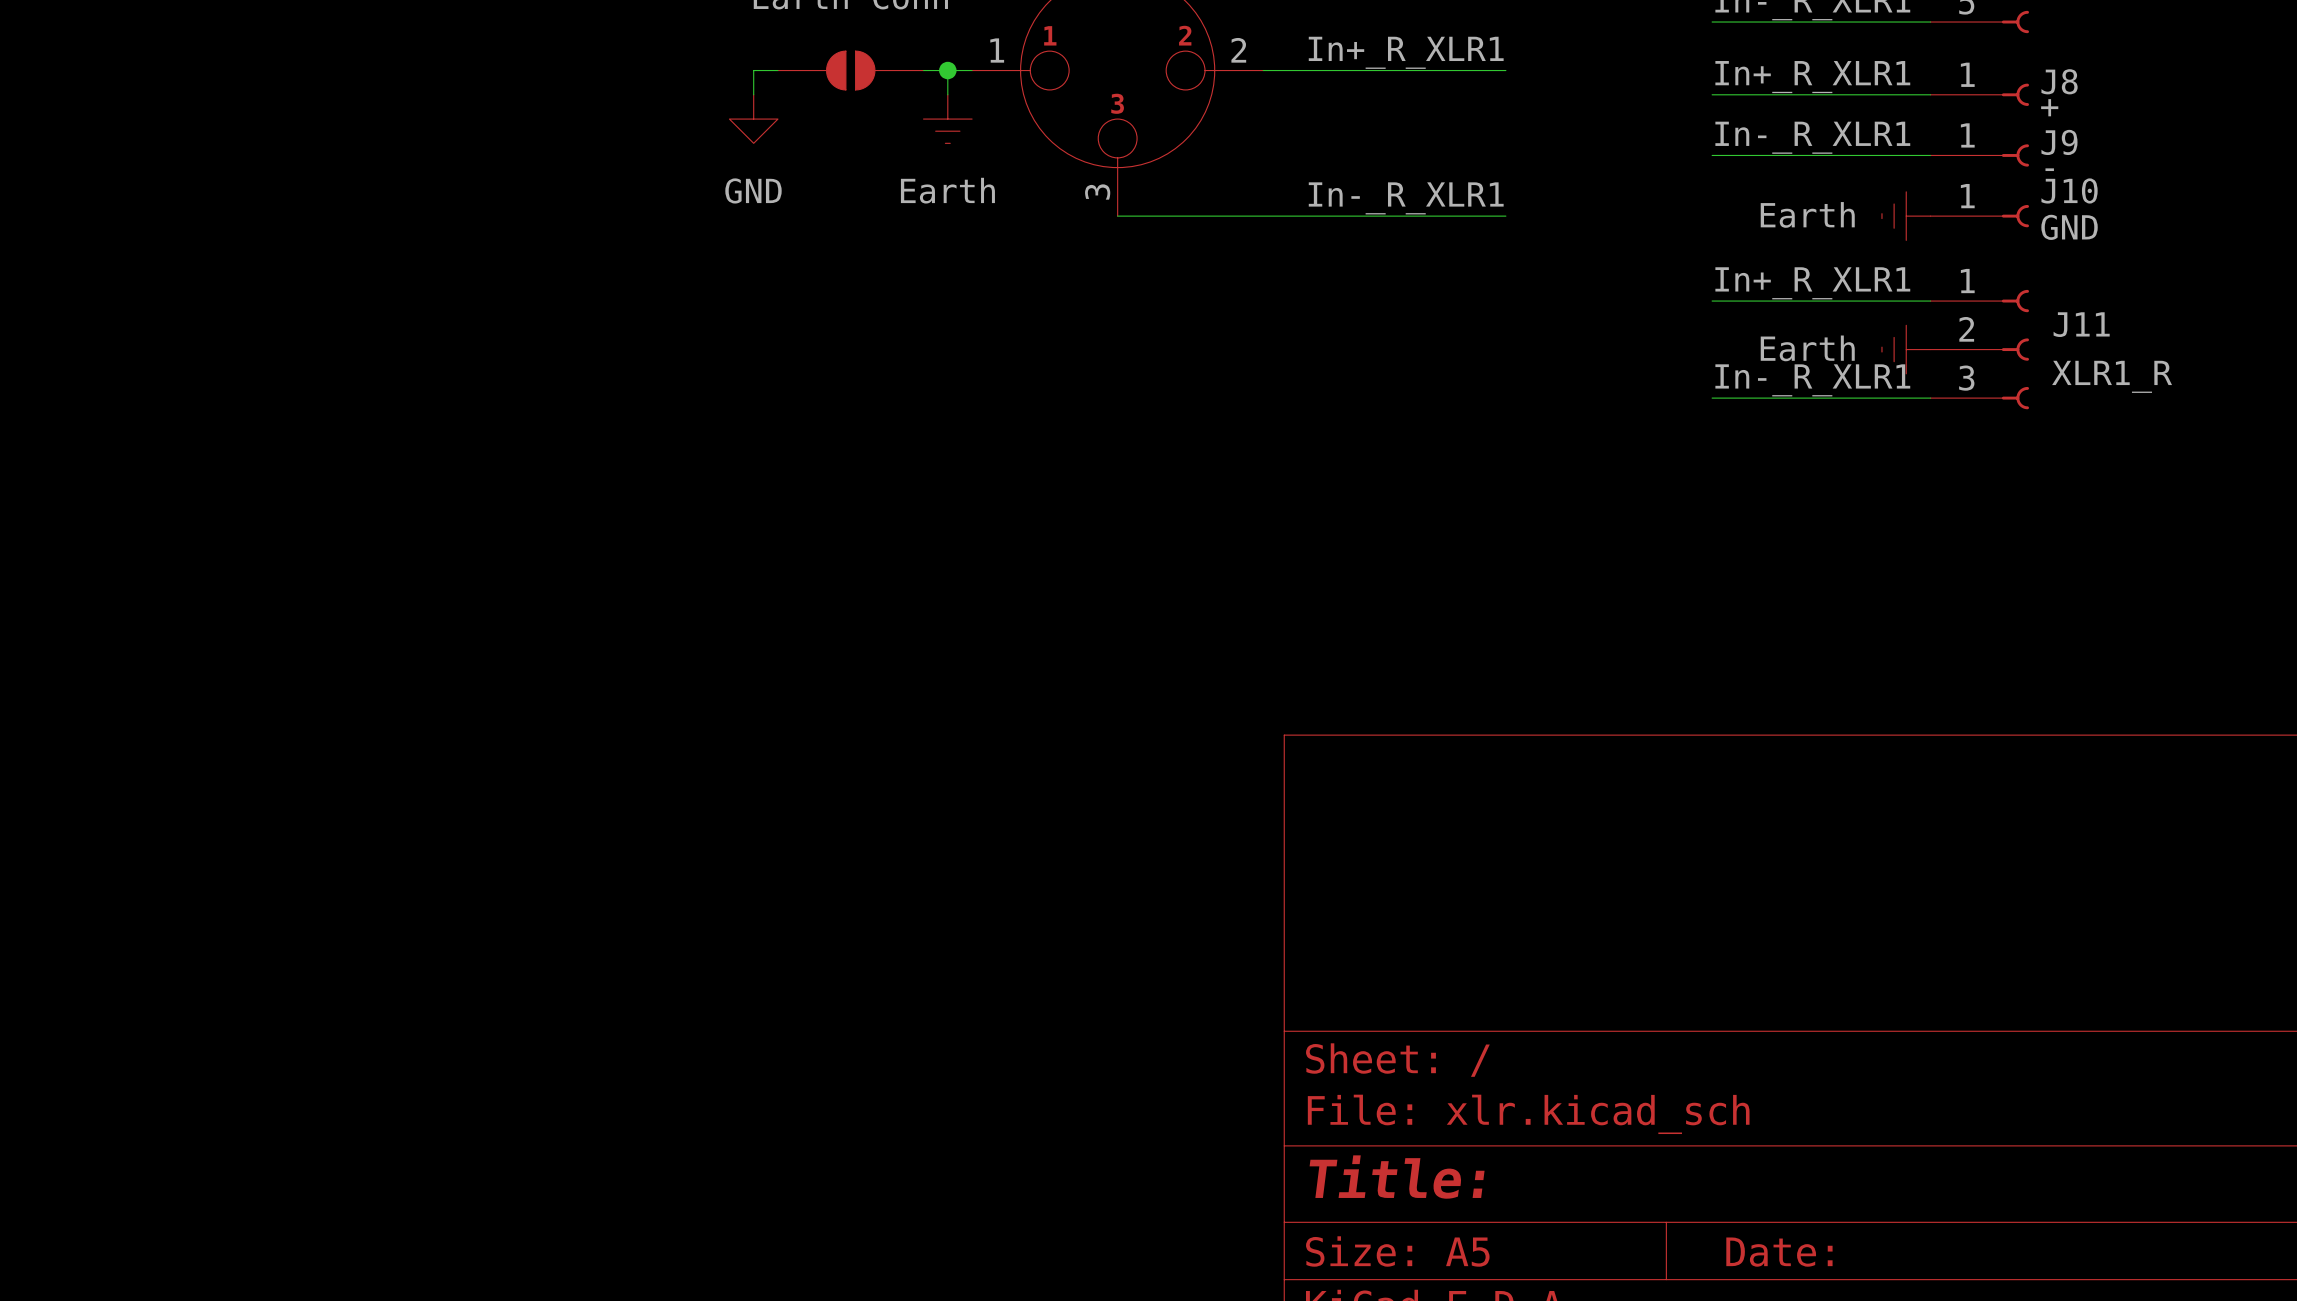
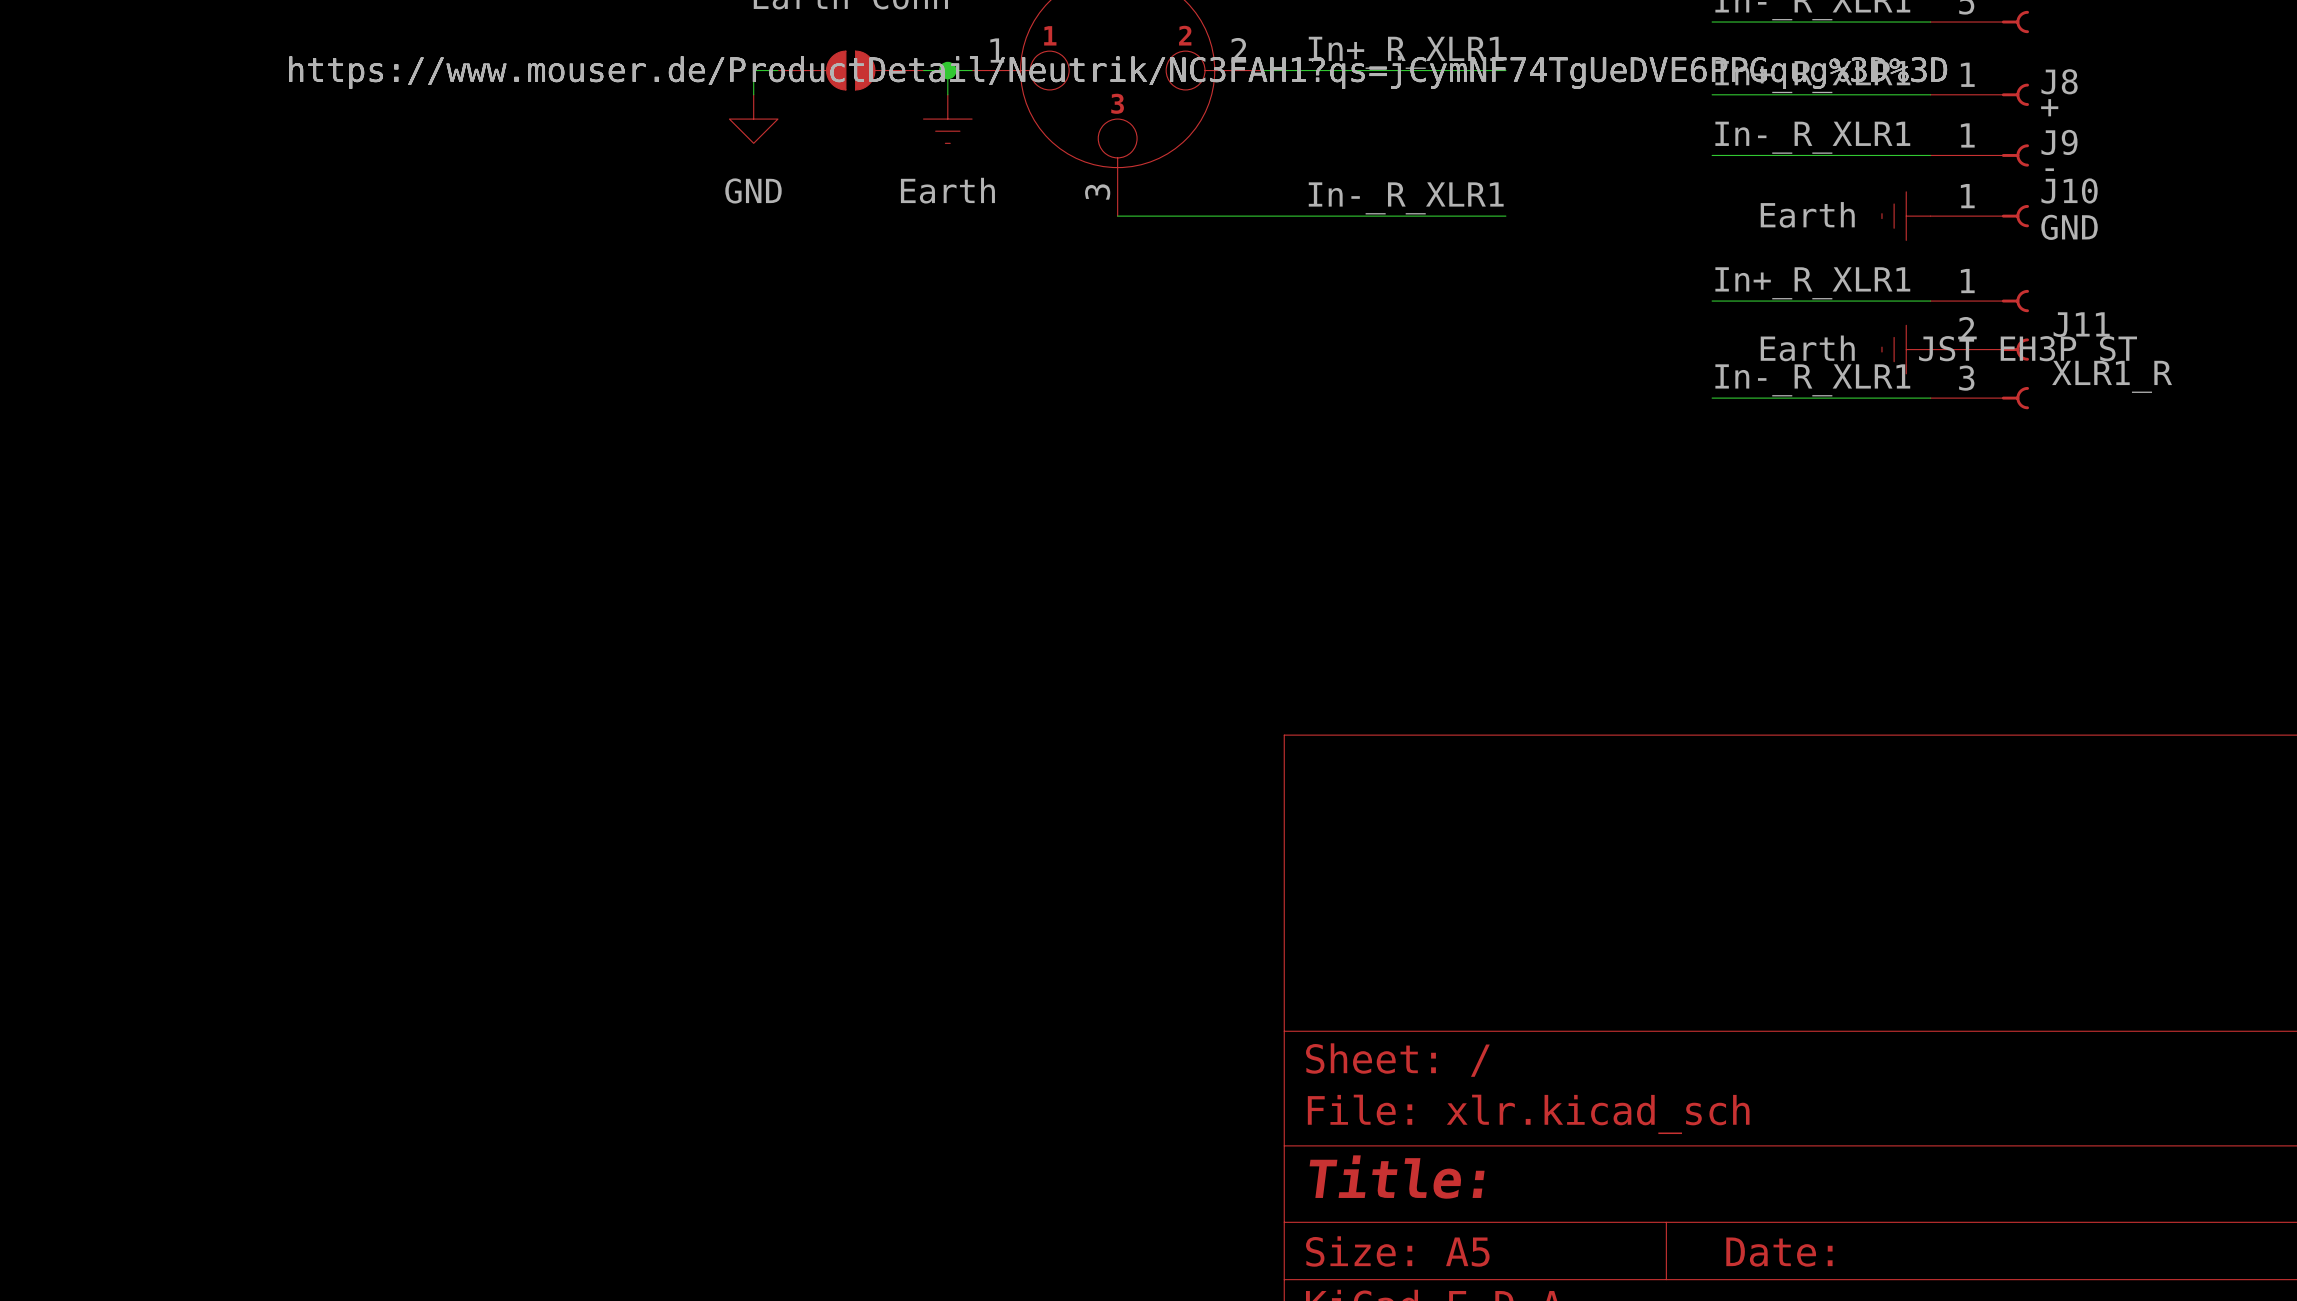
part text: none -> https://www.mouser.de/ProductDetail/Neutrik/NC3FAH1?qs=jCymNF74TgUeDVE6PPGqug%3D%3D (1118, 72)
part text: none -> https://www.mouser.de/ProductDetail/Neutrik/NC3FAH1?qs=jCymNF74TgUeDVE6PPGqug%3D%3D (1118, 72)
J11 text: none -> JST EH3P ST (2028, 348)

